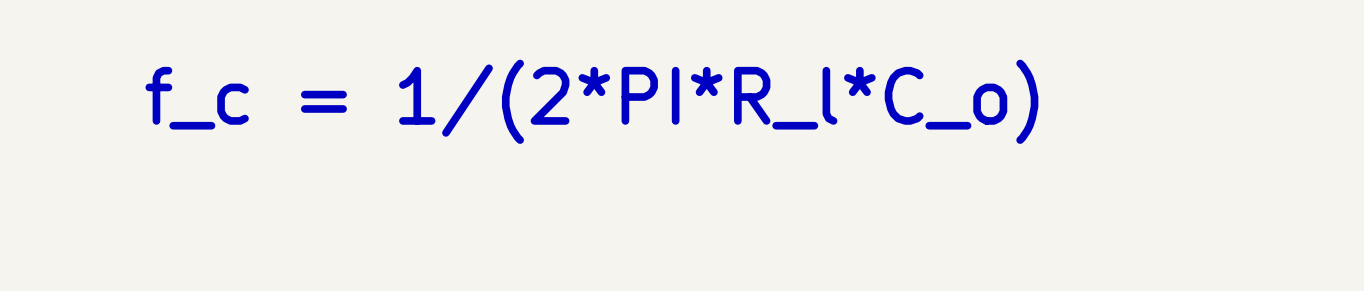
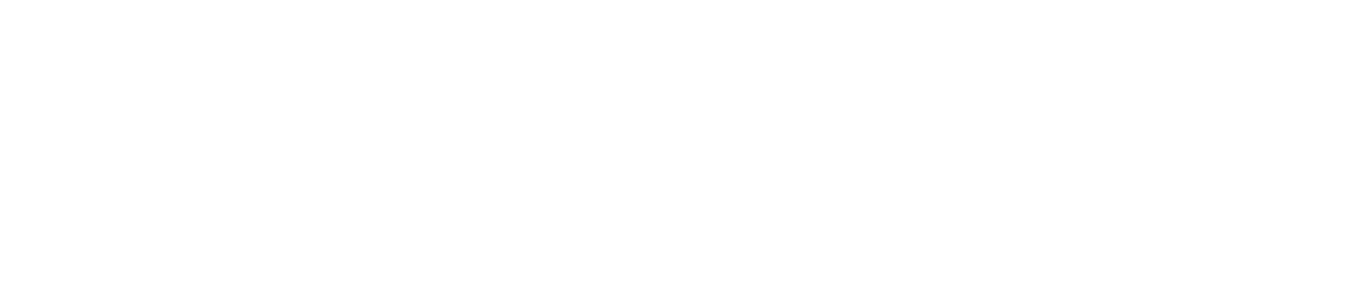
text: f_c = 1/(2*PI*R_l*C_o) (591, 101) -> none

